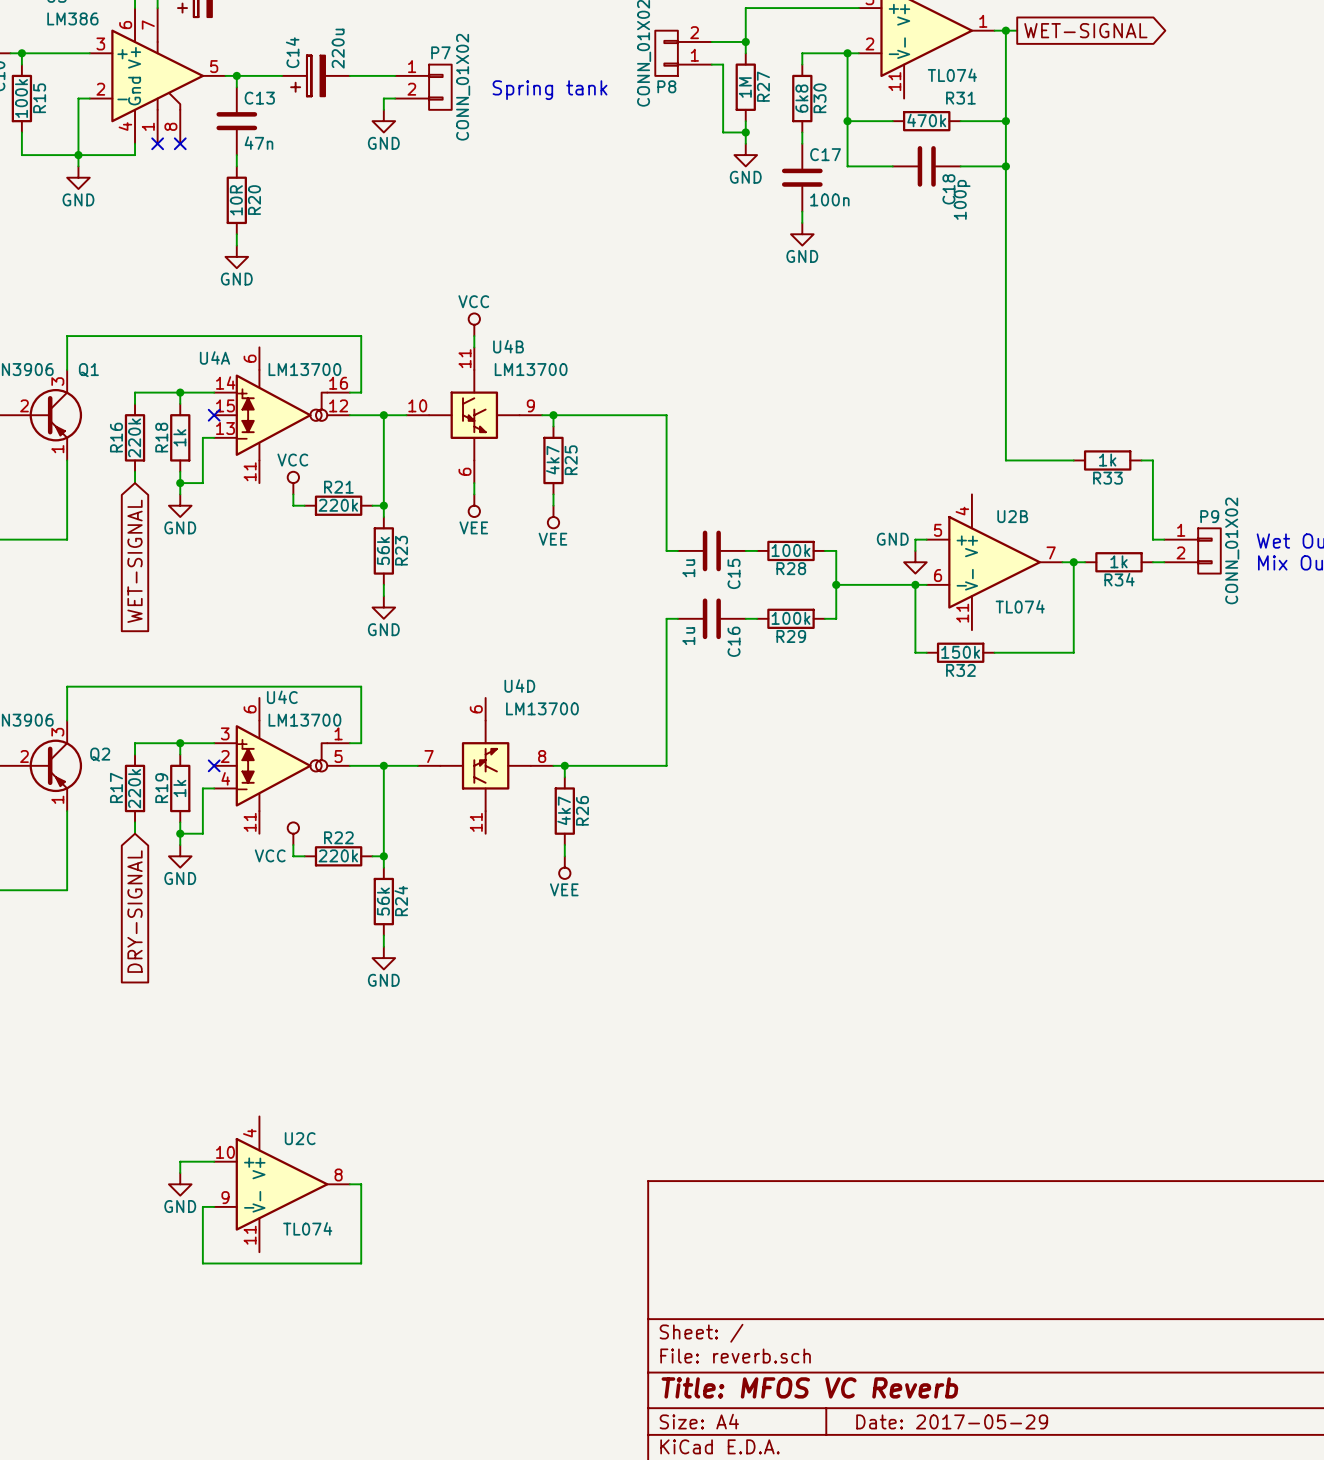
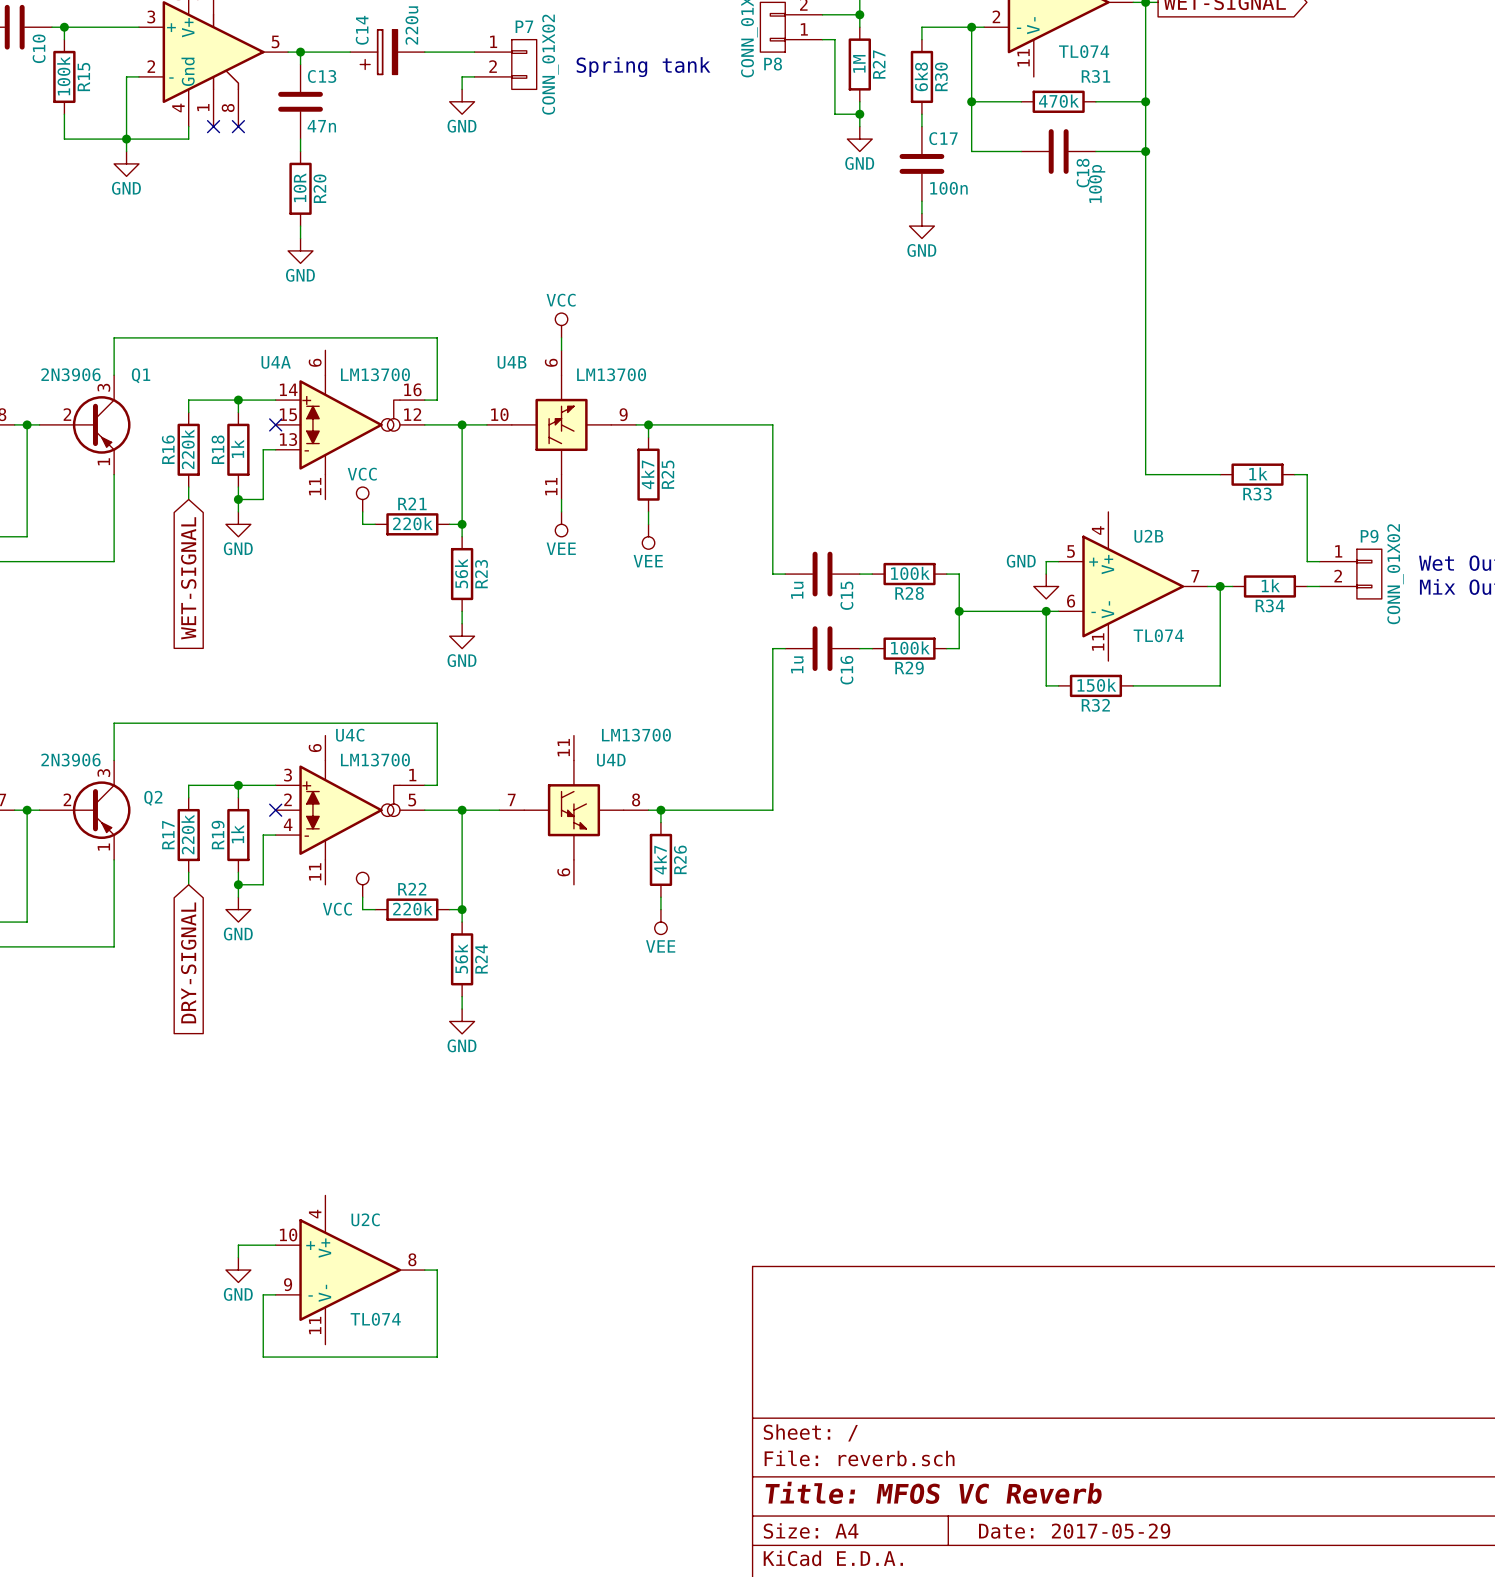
U4B name position: U4B (508, 346) -> U4B (512, 362)
U4B flip: as is (474, 415) -> up-down (561, 424)
U4D name position: U4D (519, 685) -> U4D (611, 760)
U4D flip: as is (485, 765) -> up-down (573, 810)

